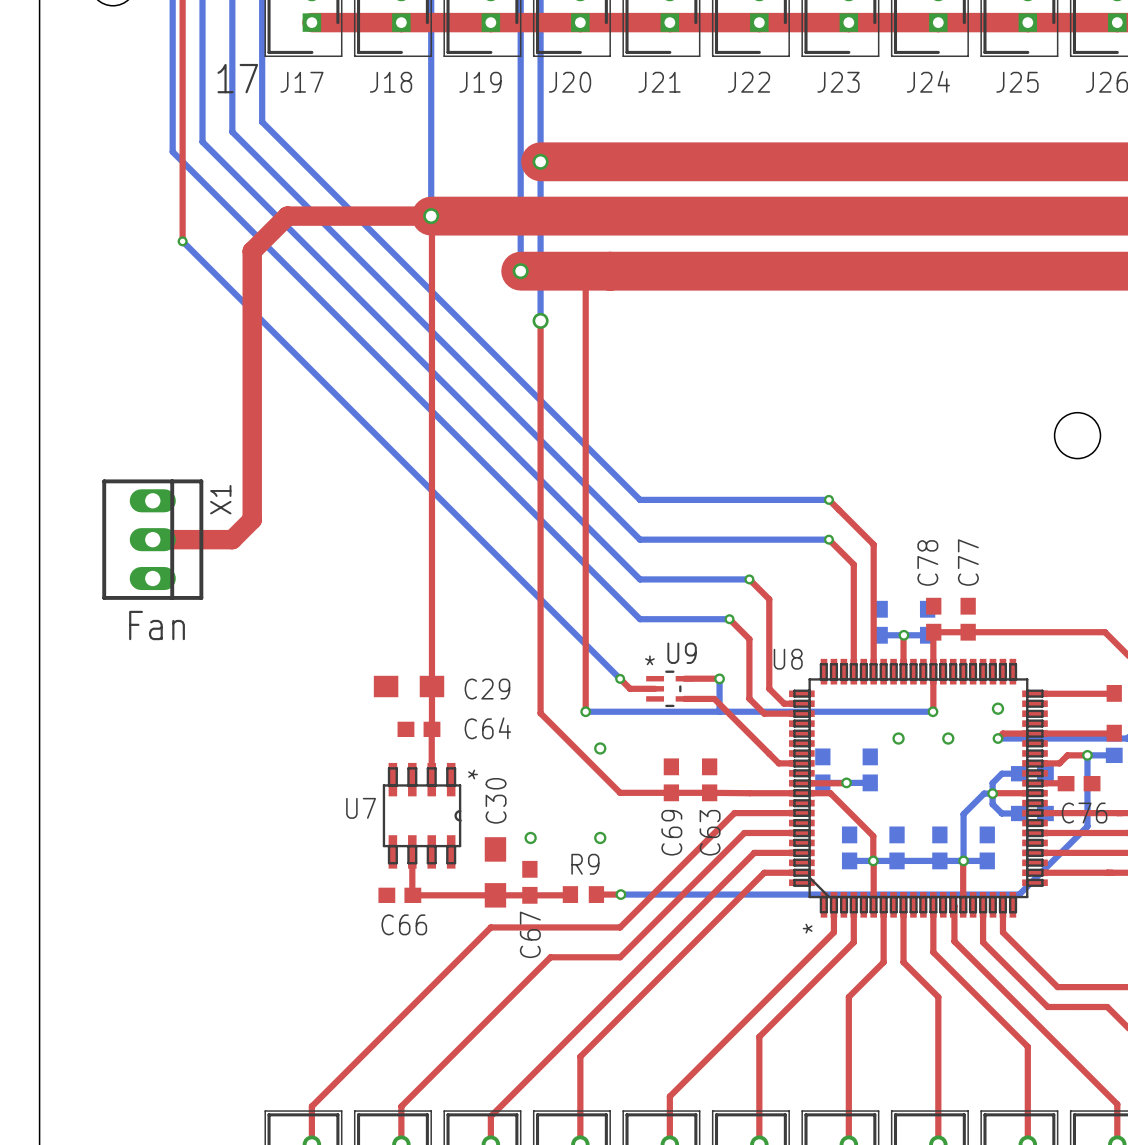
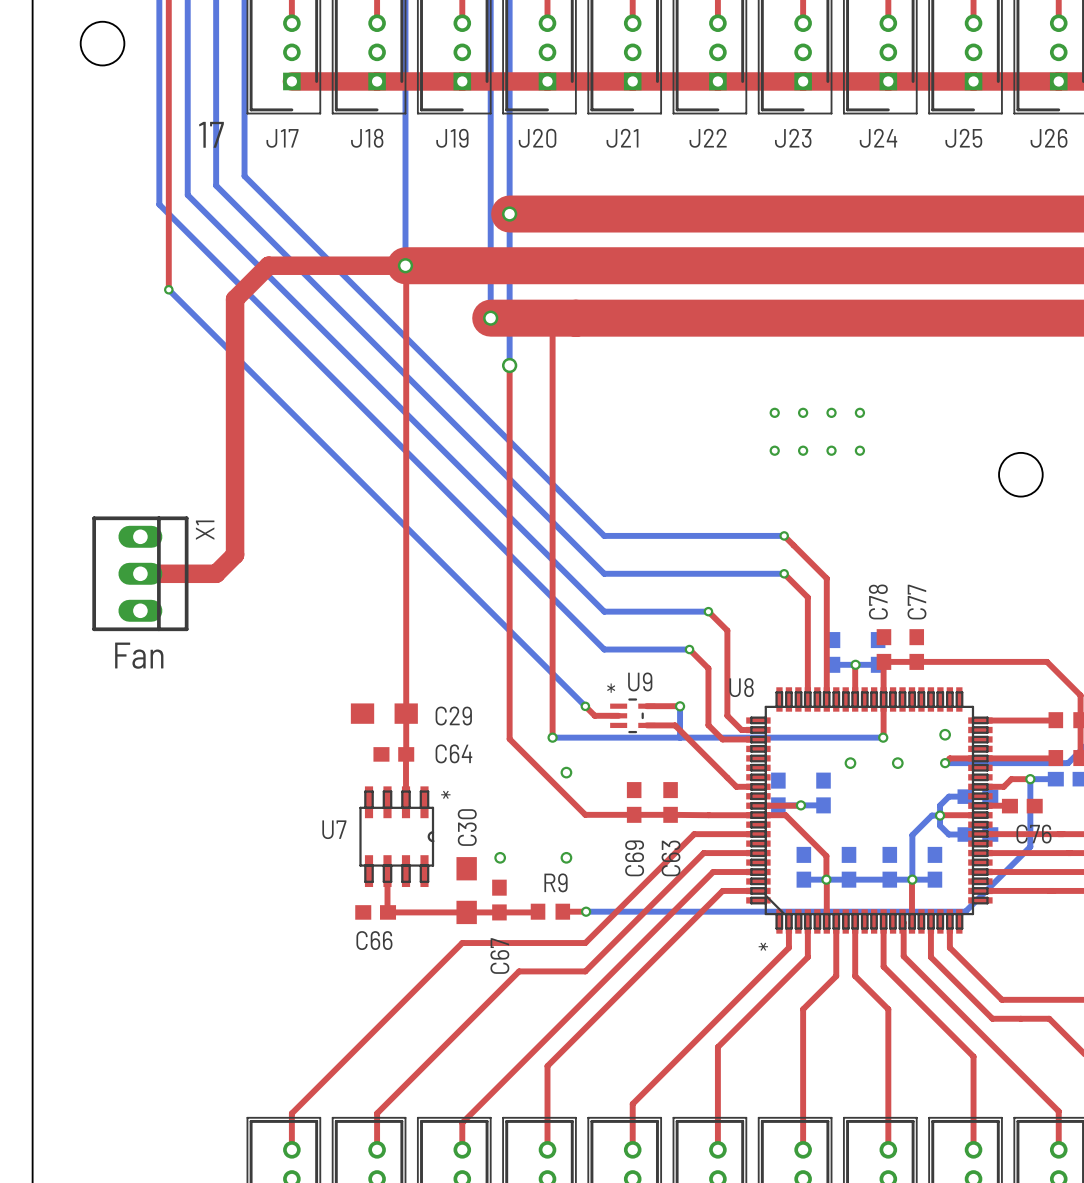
via: none -> (774, 412)
via: none -> (803, 412)
via: none -> (831, 412)
via: none -> (859, 412)
via: none -> (774, 450)
via: none -> (803, 450)
via: none -> (831, 450)
via: none -> (859, 450)

